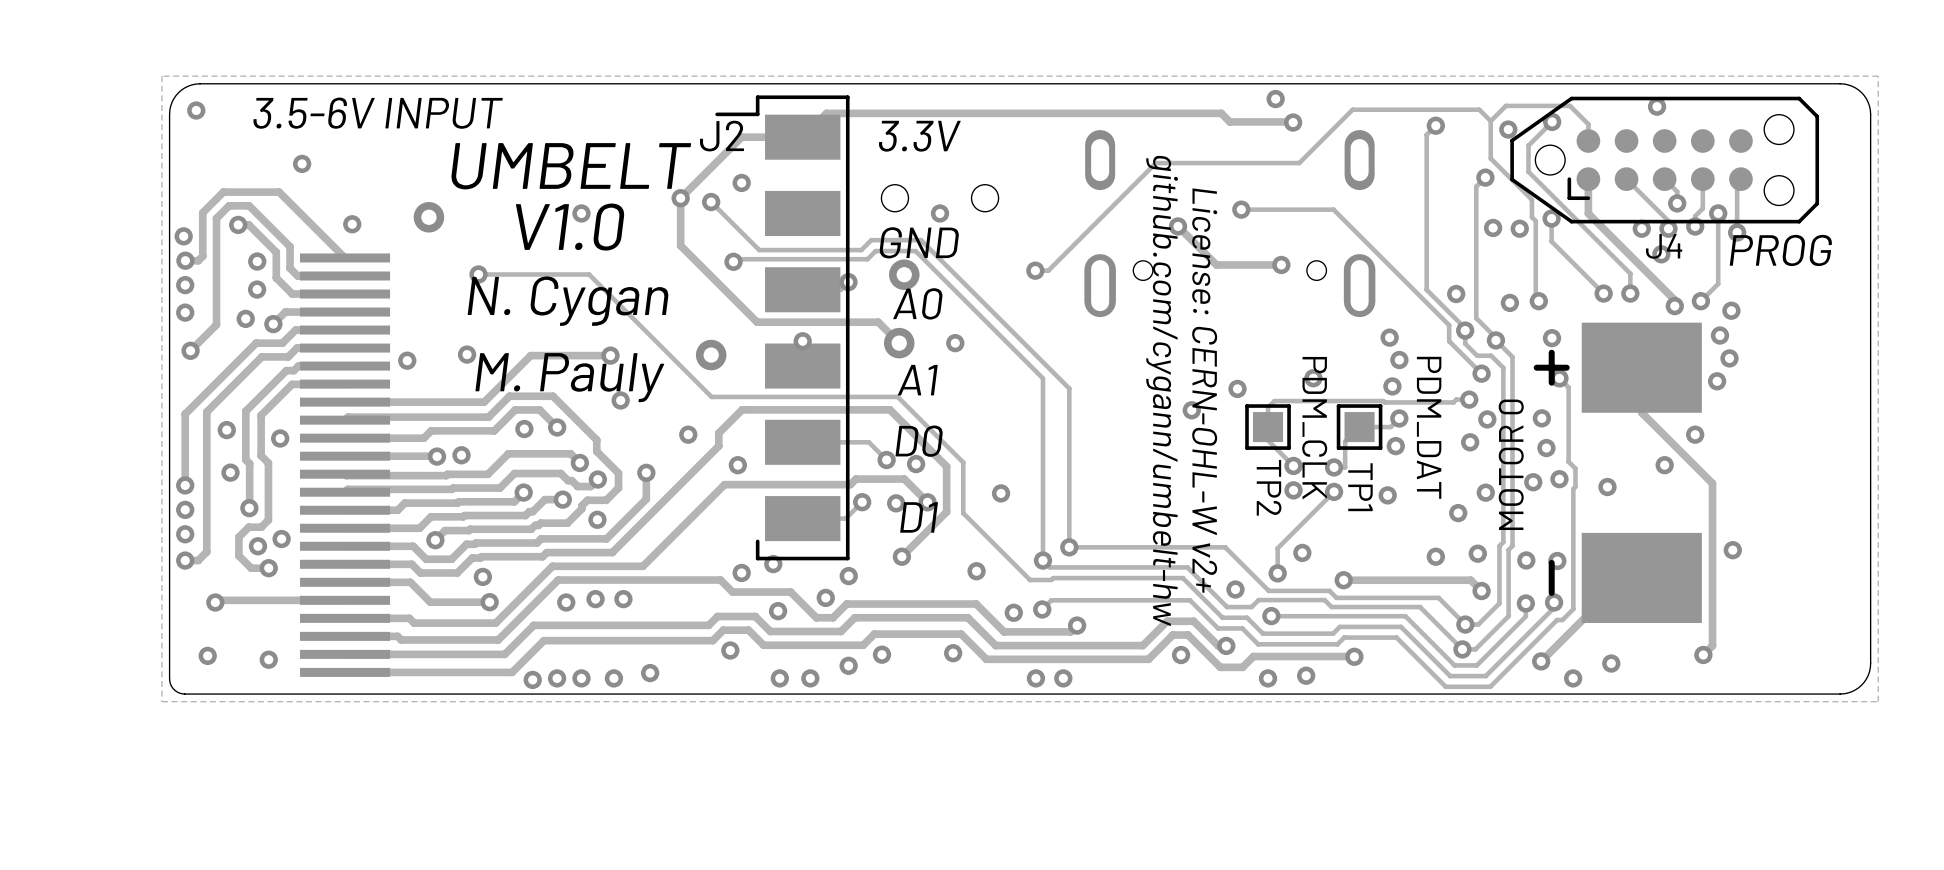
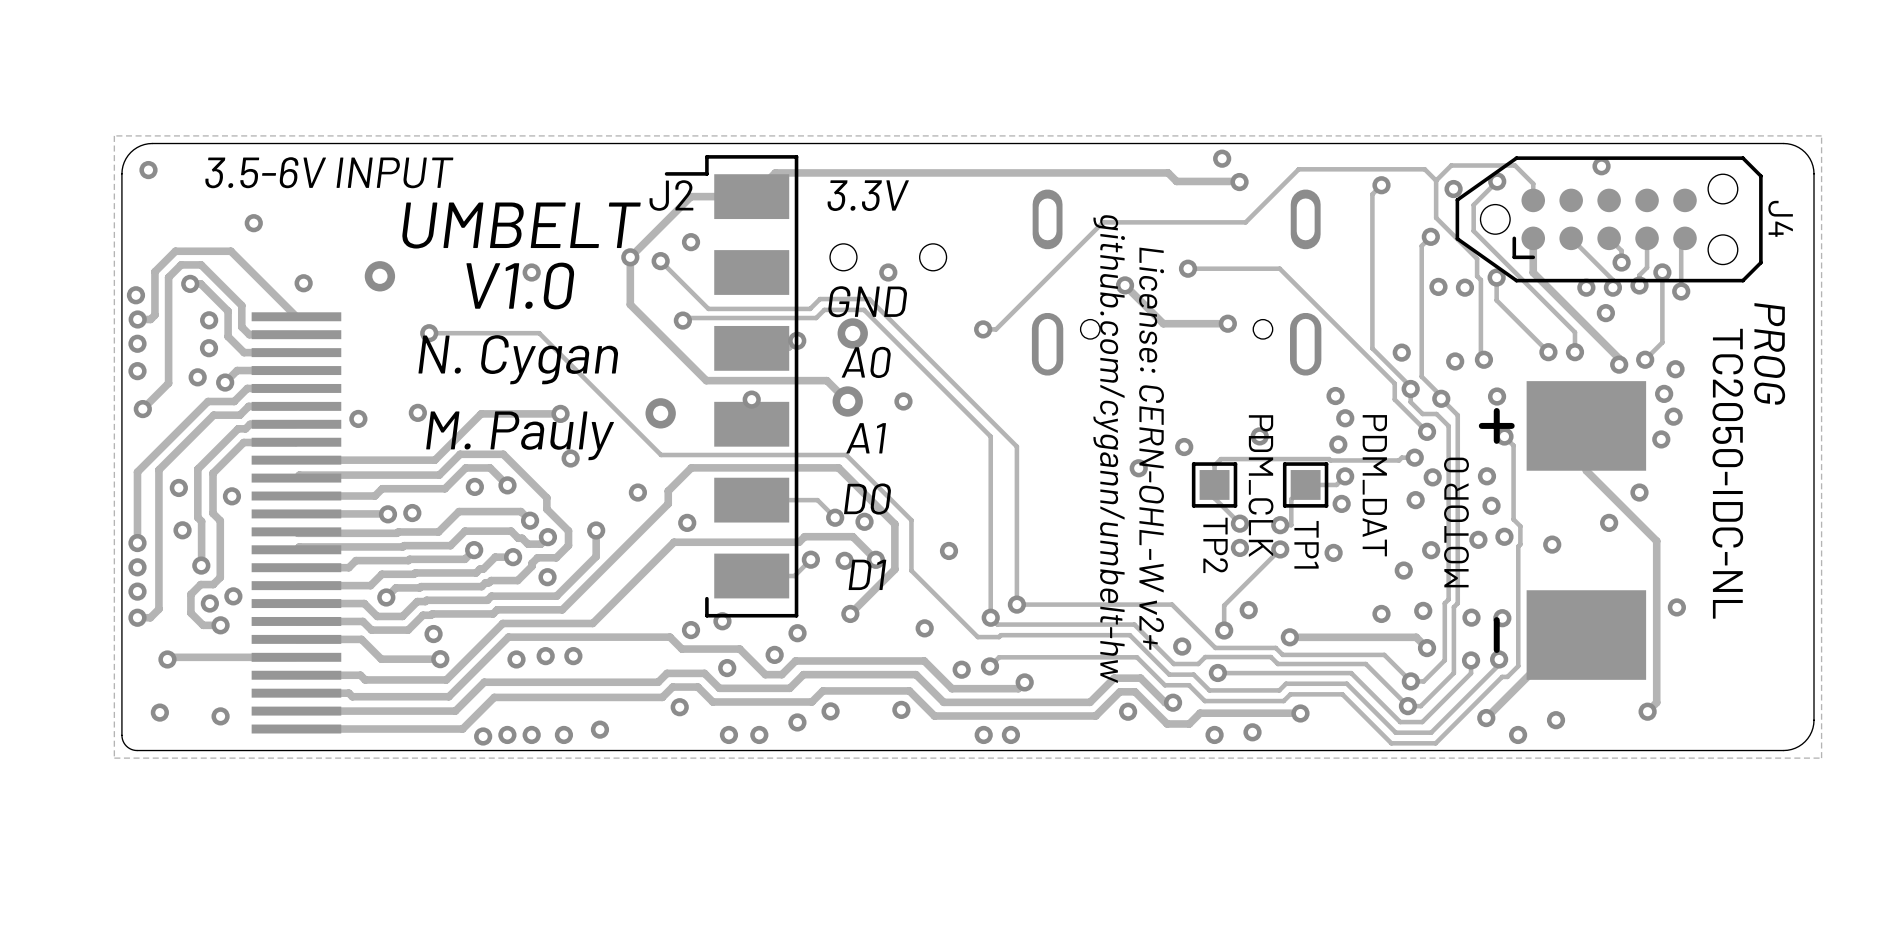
J4 name rotation: 0° (1664, 246) -> 90° clockwise (1780, 218)
J4 name position: J4 (1664, 246) -> J4 (1780, 218)
text rotation: 0° (1780, 250) -> 90° clockwise (1769, 354)
J4 value: none -> TC2050-IDC-NL (1727, 473)

